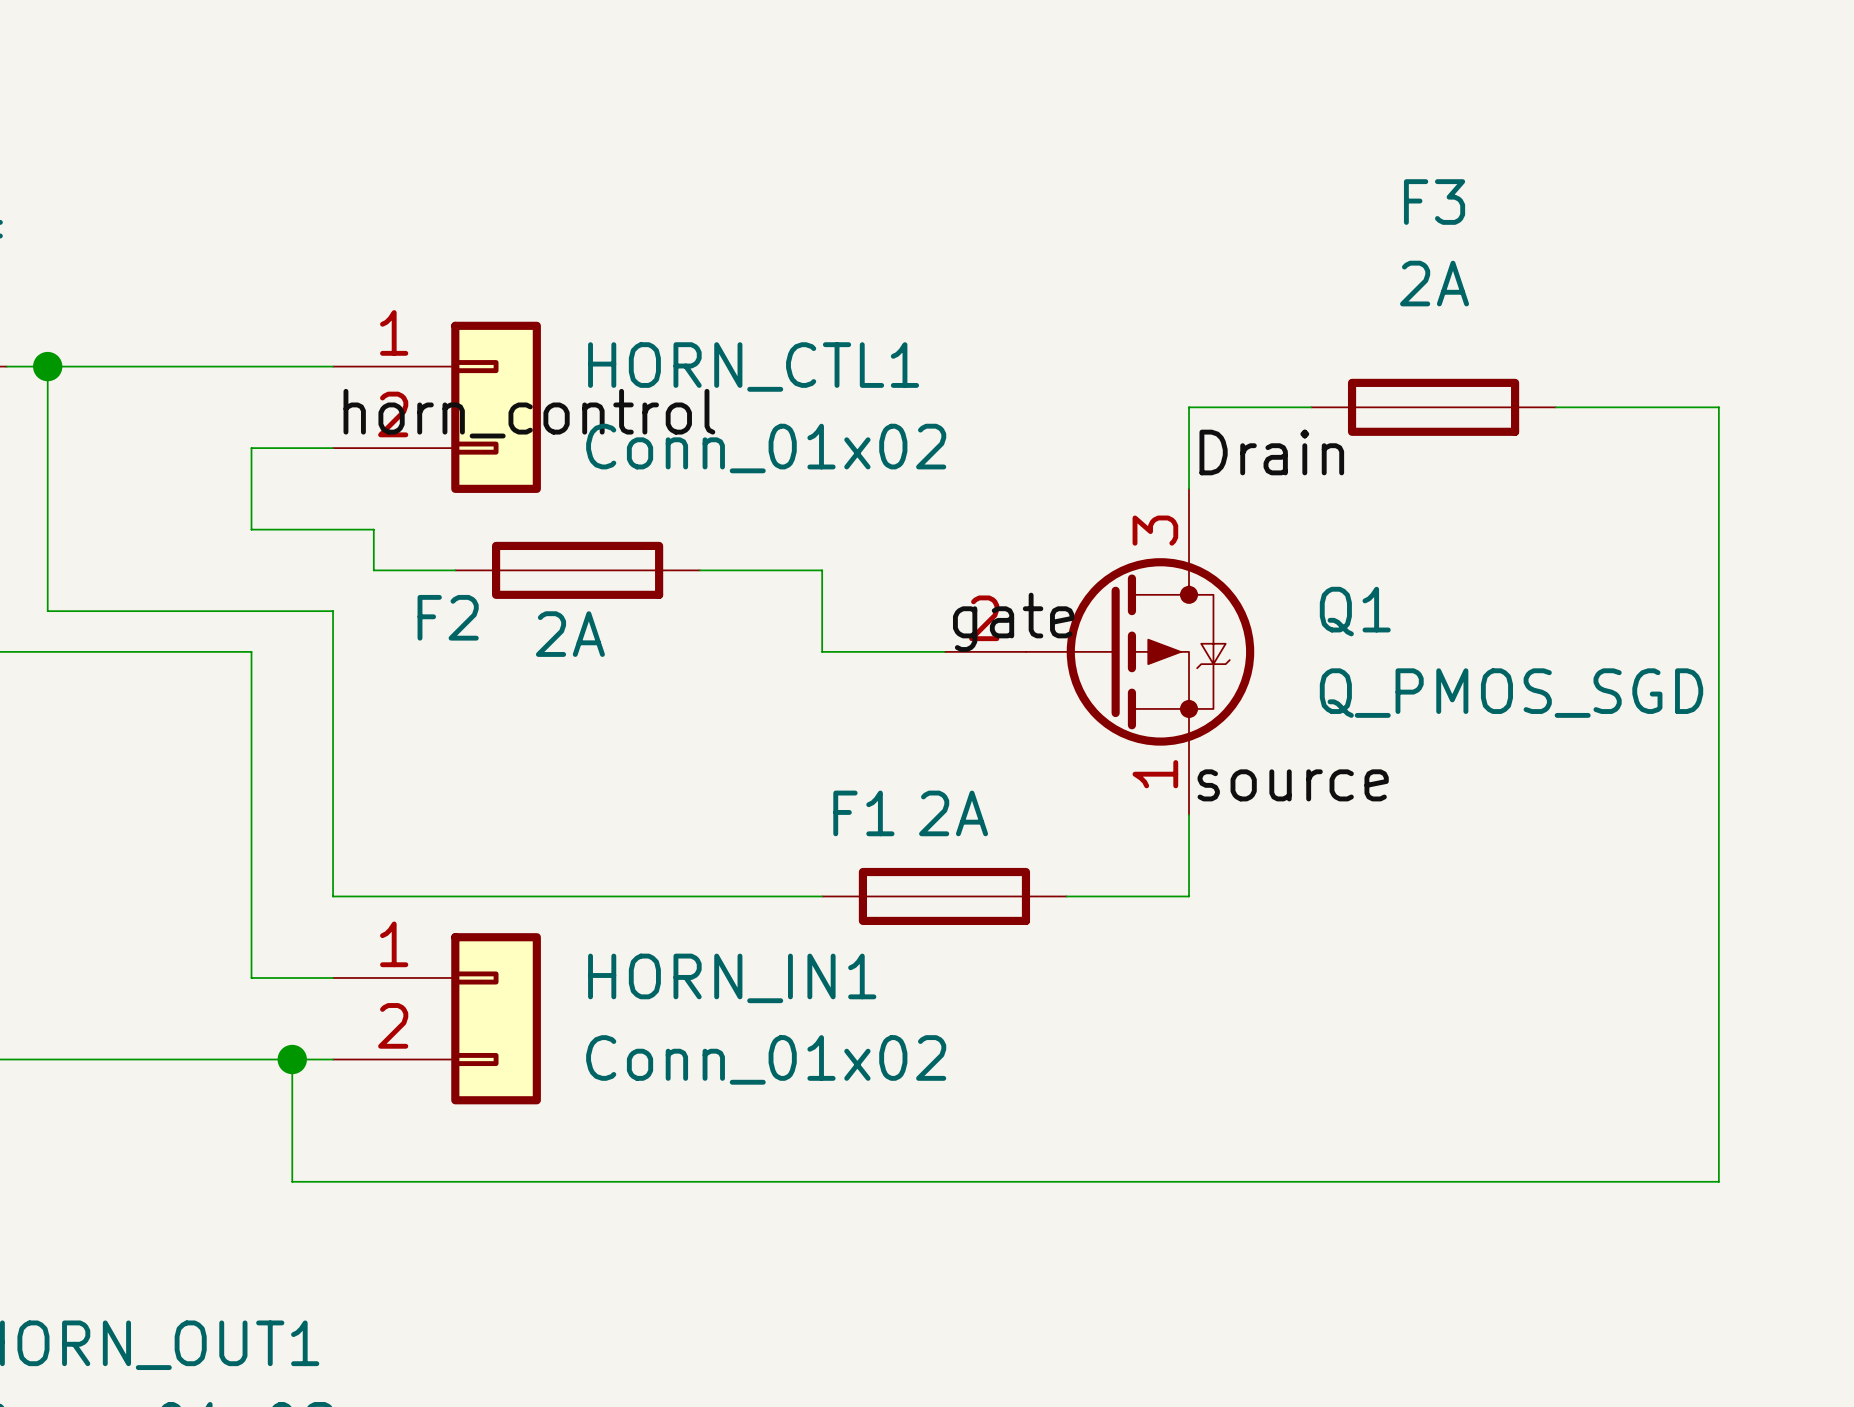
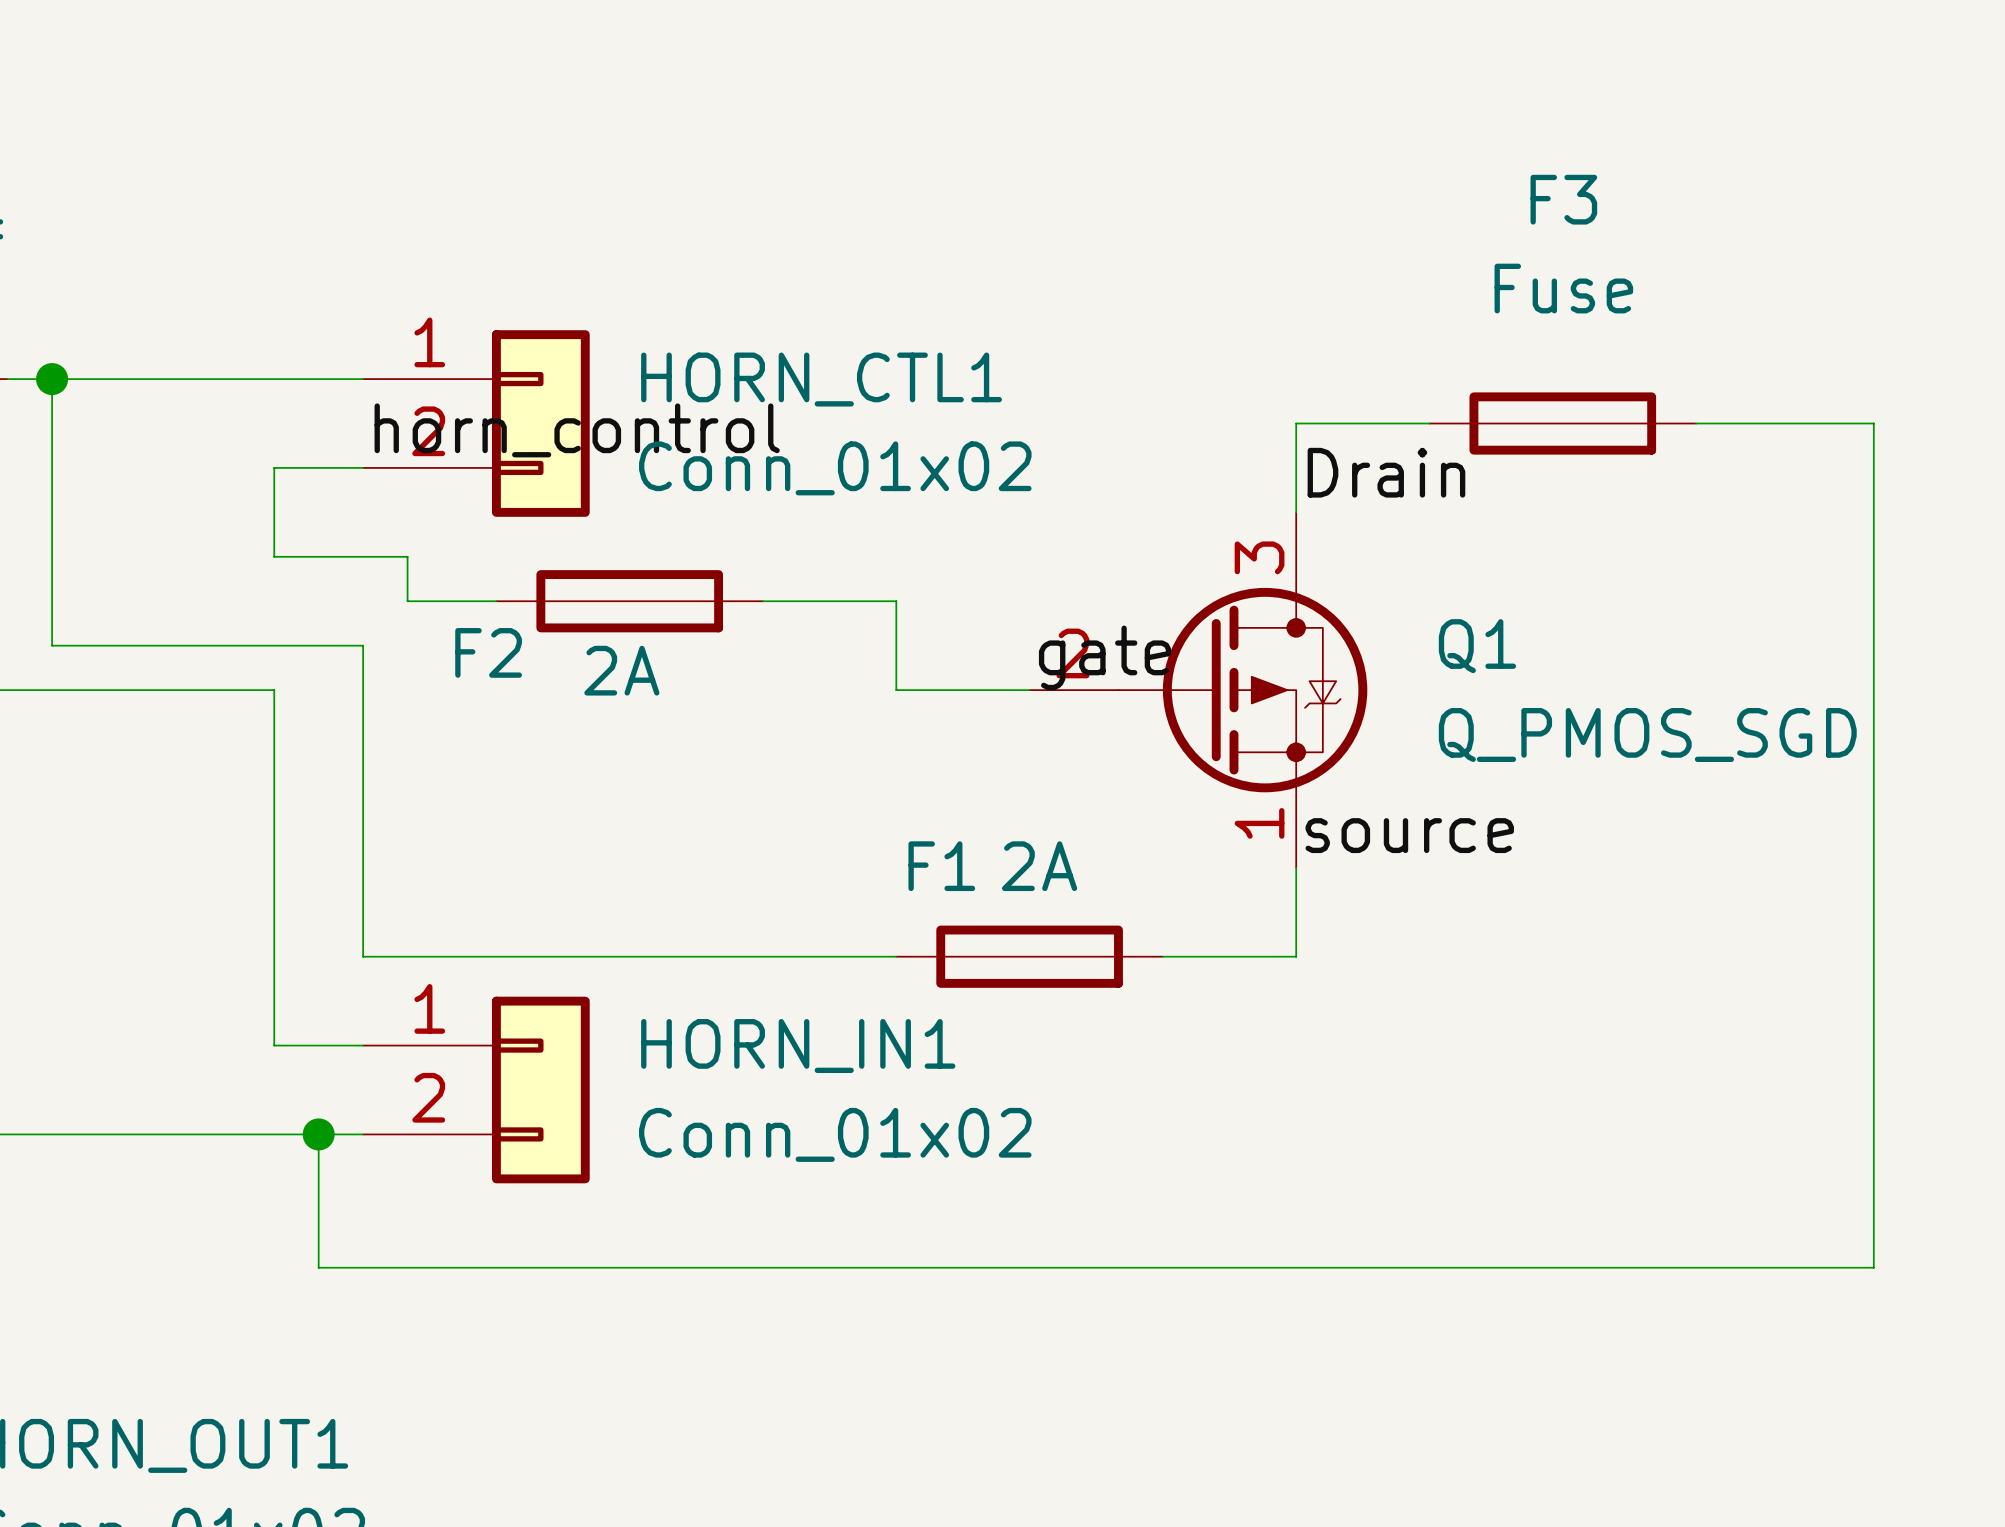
F3 value: 2A (1434, 283) -> Fuse (1563, 288)

